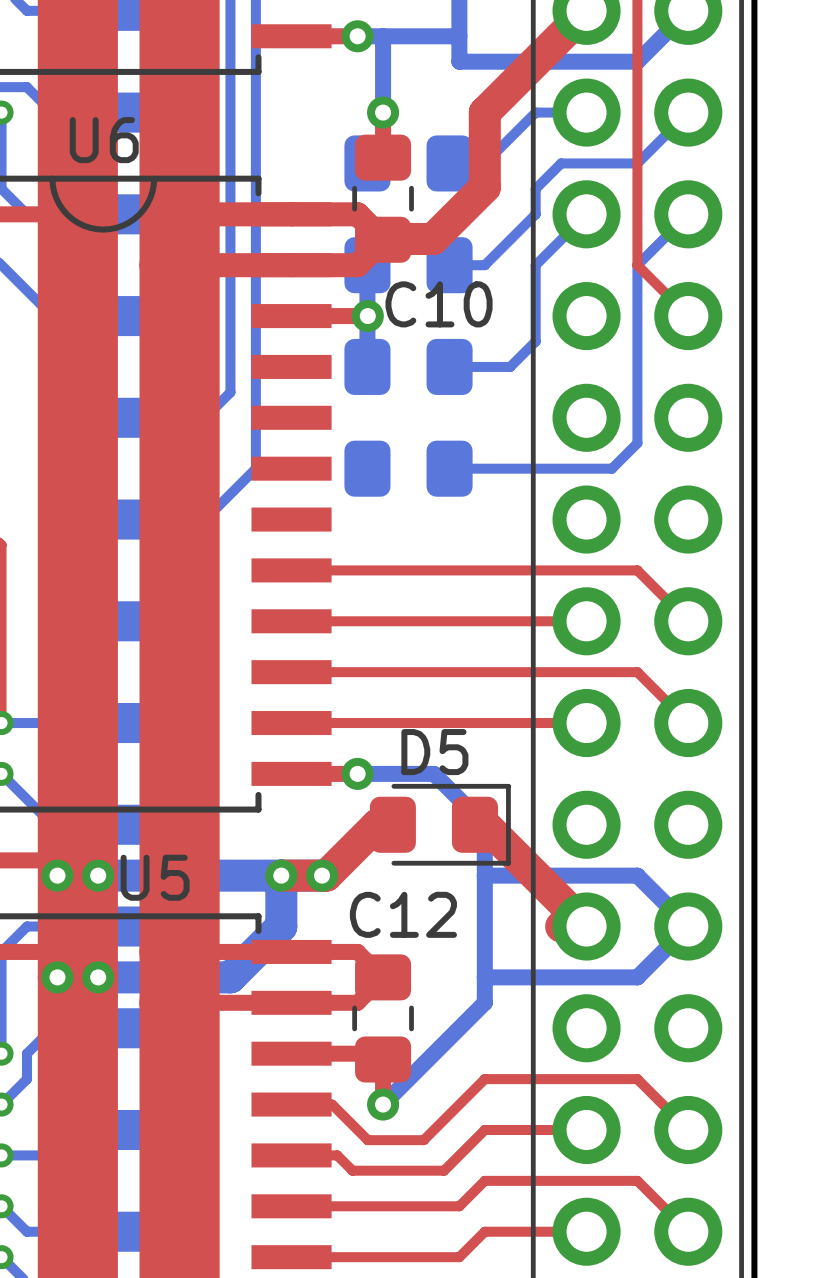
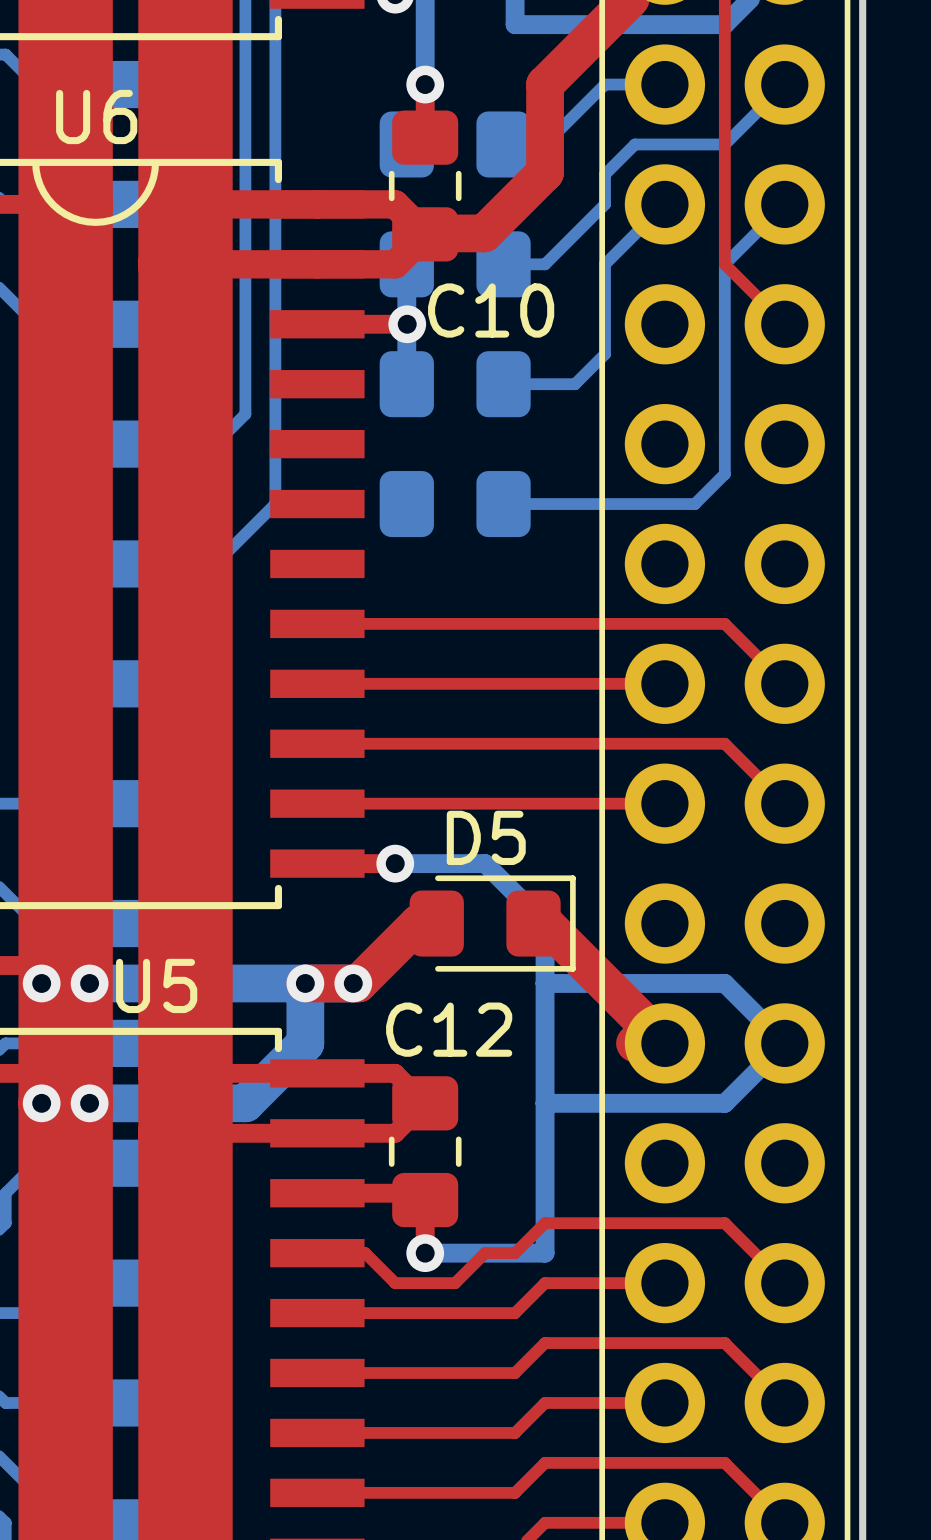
bottom track: (484, 1002) (383, 1104) -> (545, 1133) (545, 1253) (425, 1253)
top track: (459, 1104) (423, 1140) (367, 1140) (357, 1129) -> (515, 1253) (485, 1253) (455, 1283) (395, 1283)
top track: (337, 1155) (352, 1170) (444, 1170) (459, 1155) -> (371, 1313) (515, 1313)

